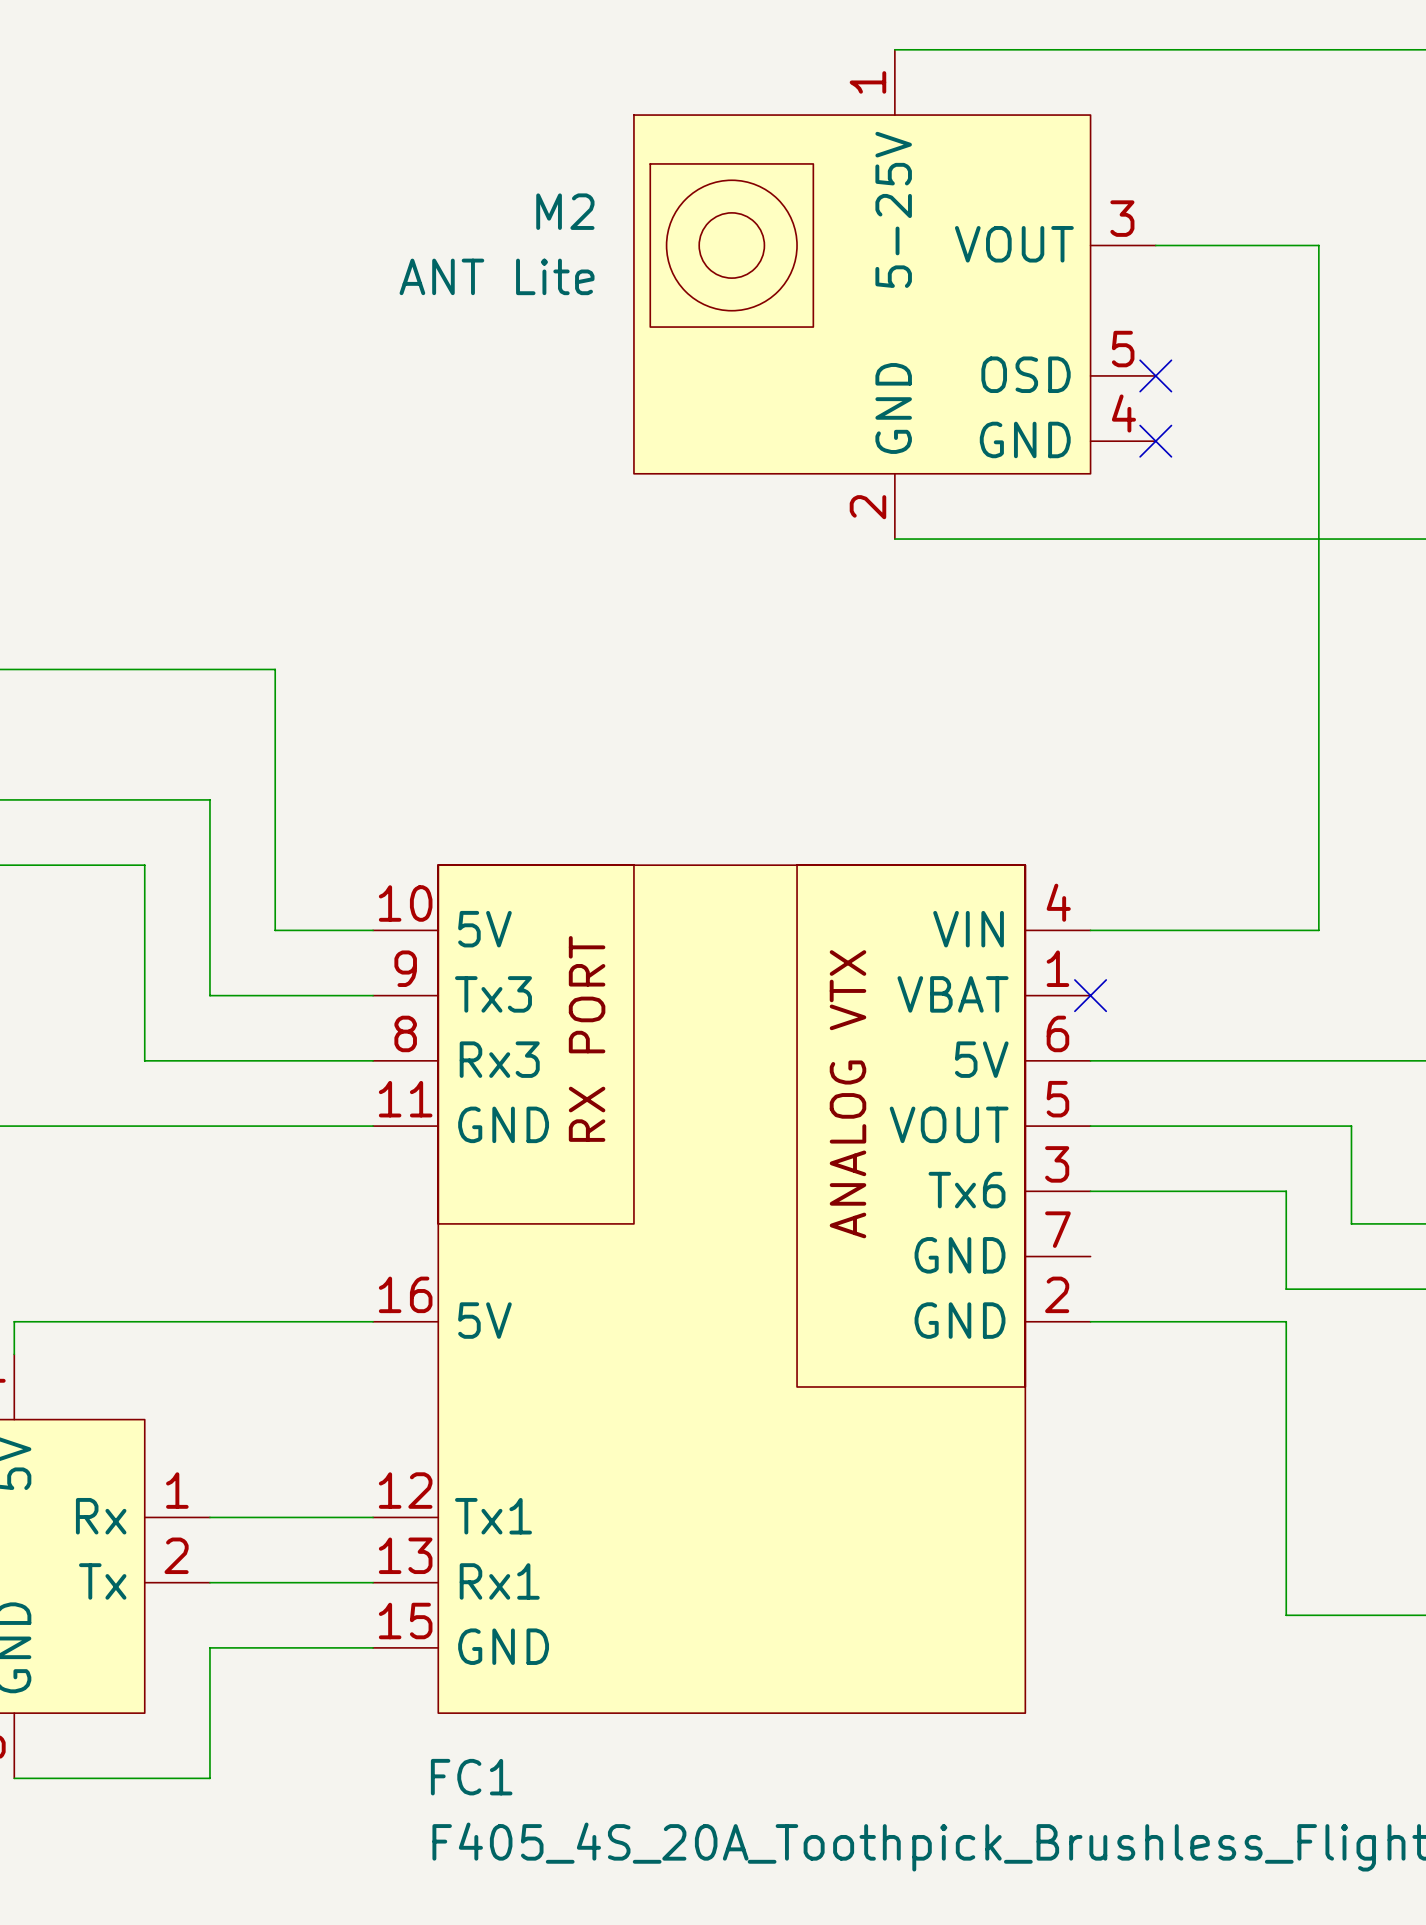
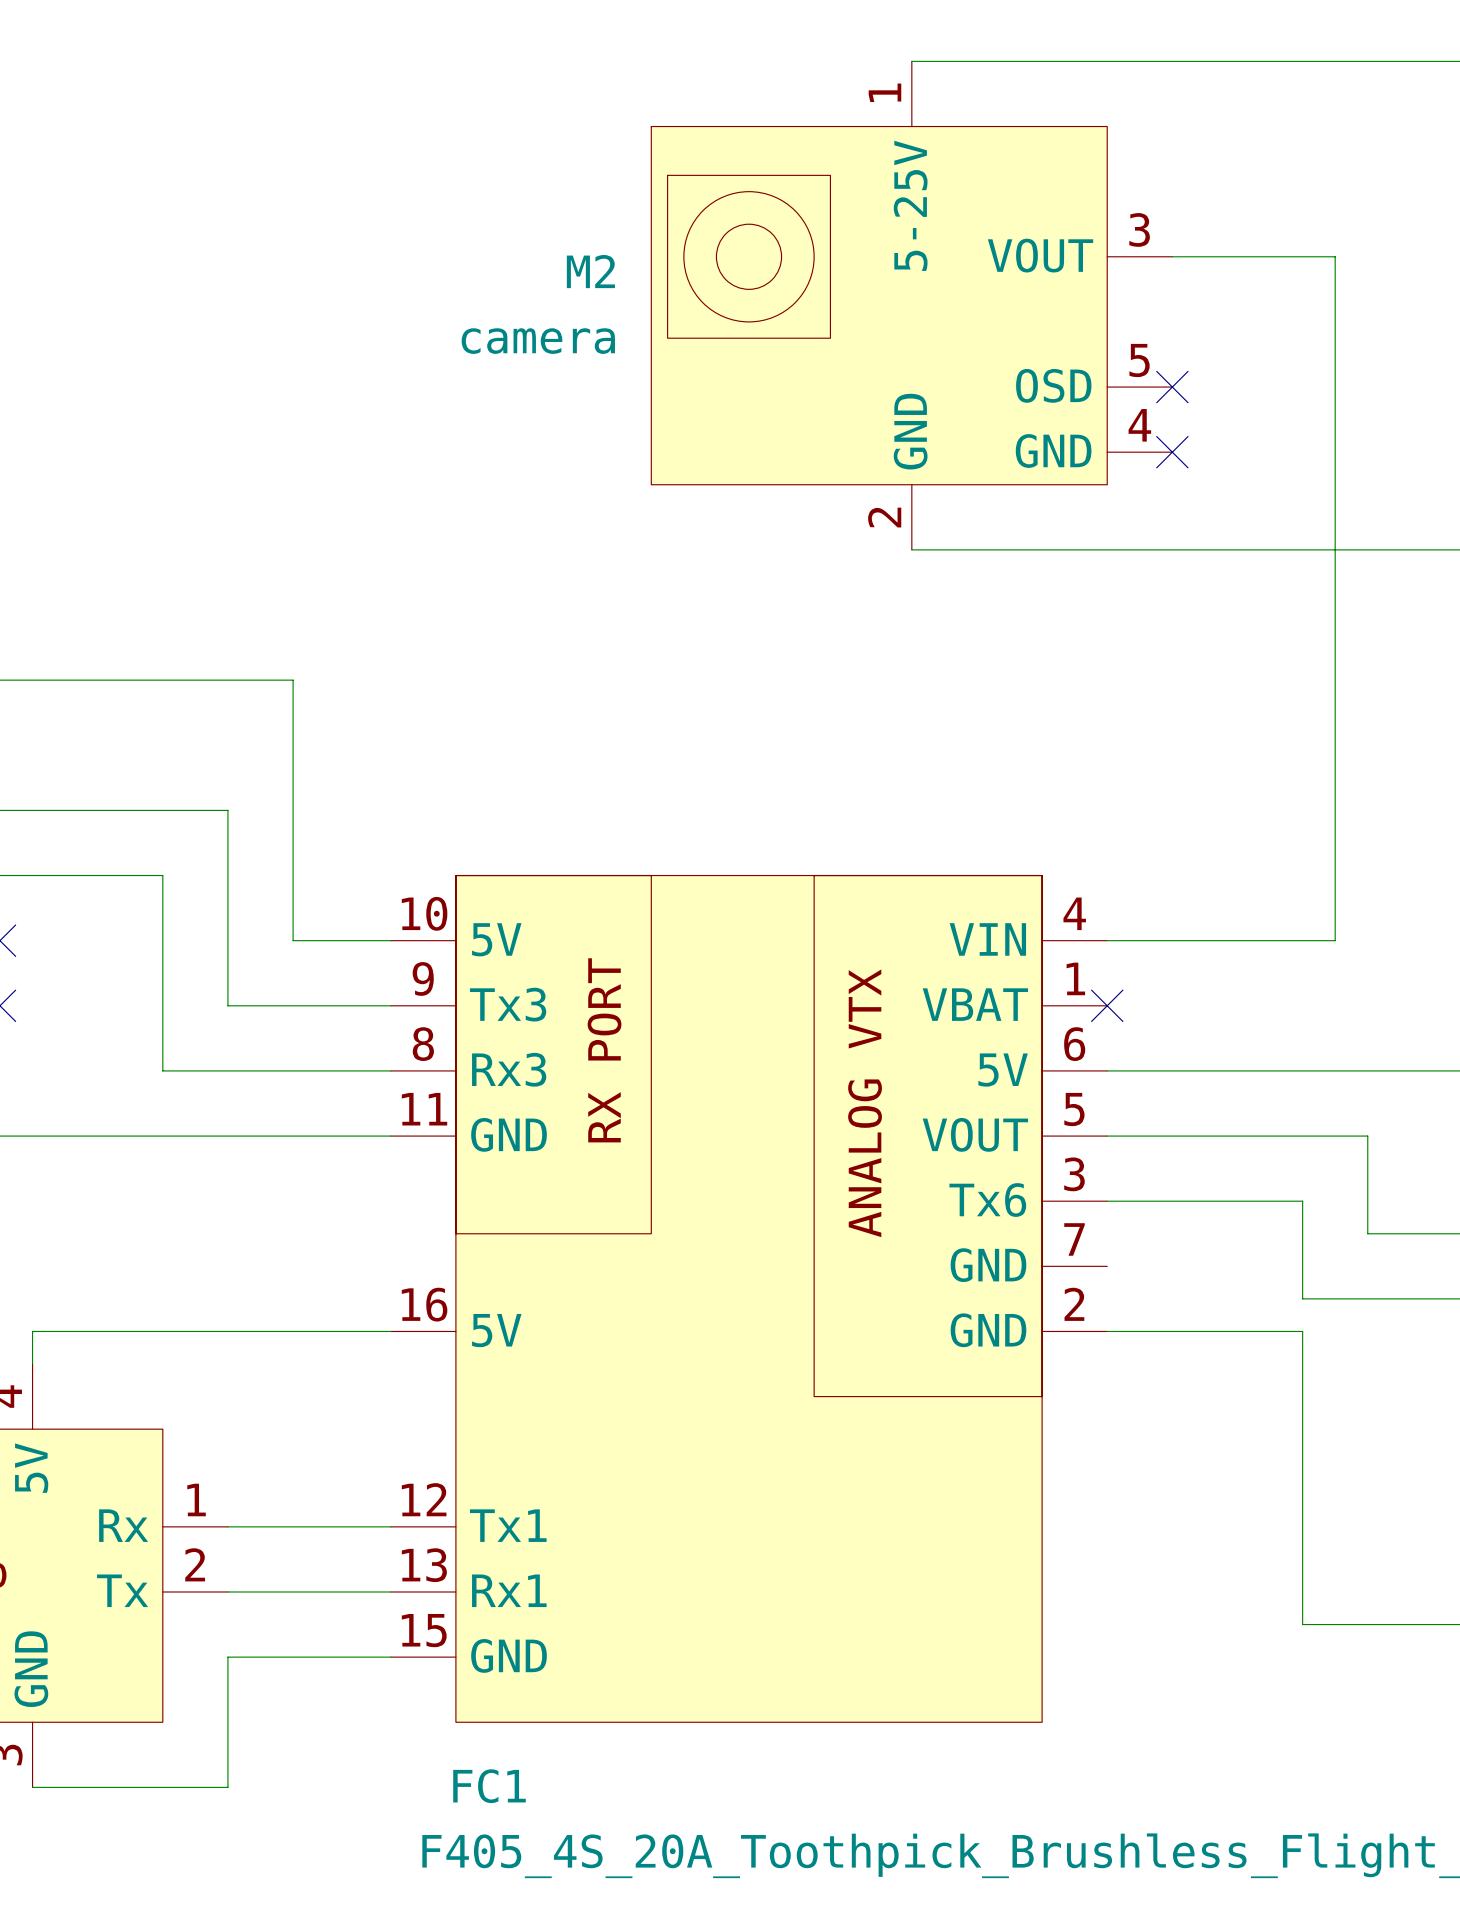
M2 name position: M2 (565, 211) -> M2 (590, 271)
M2 value: ANT Lite (497, 276) -> camera (538, 341)

